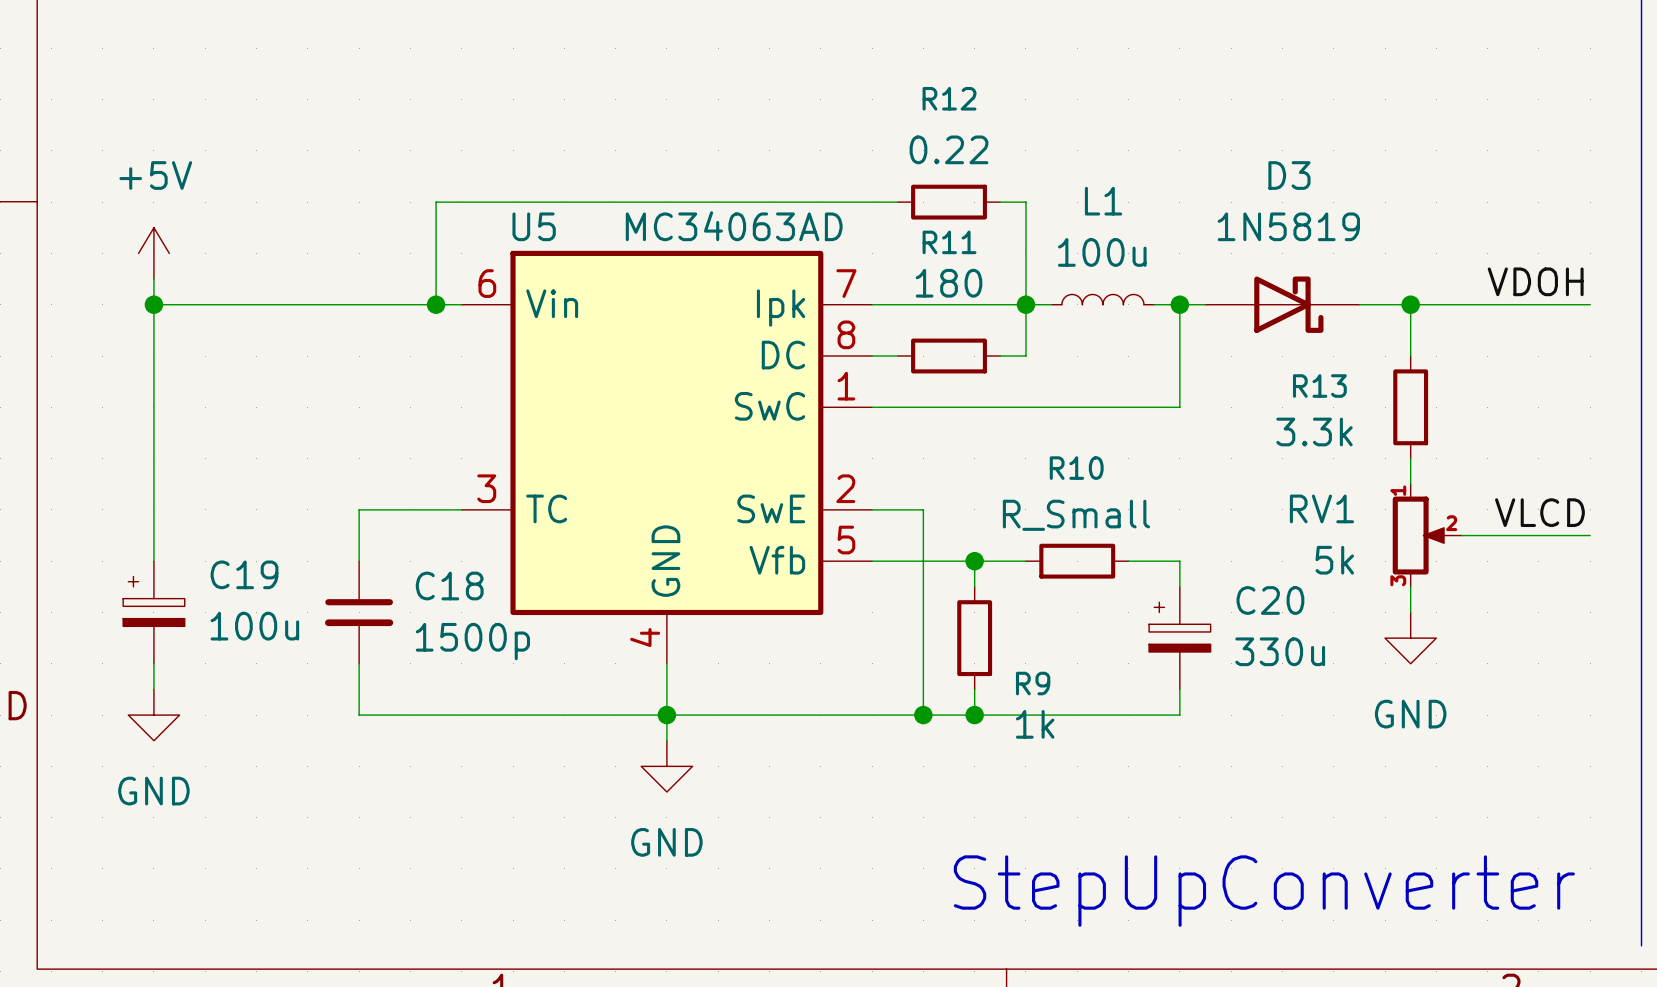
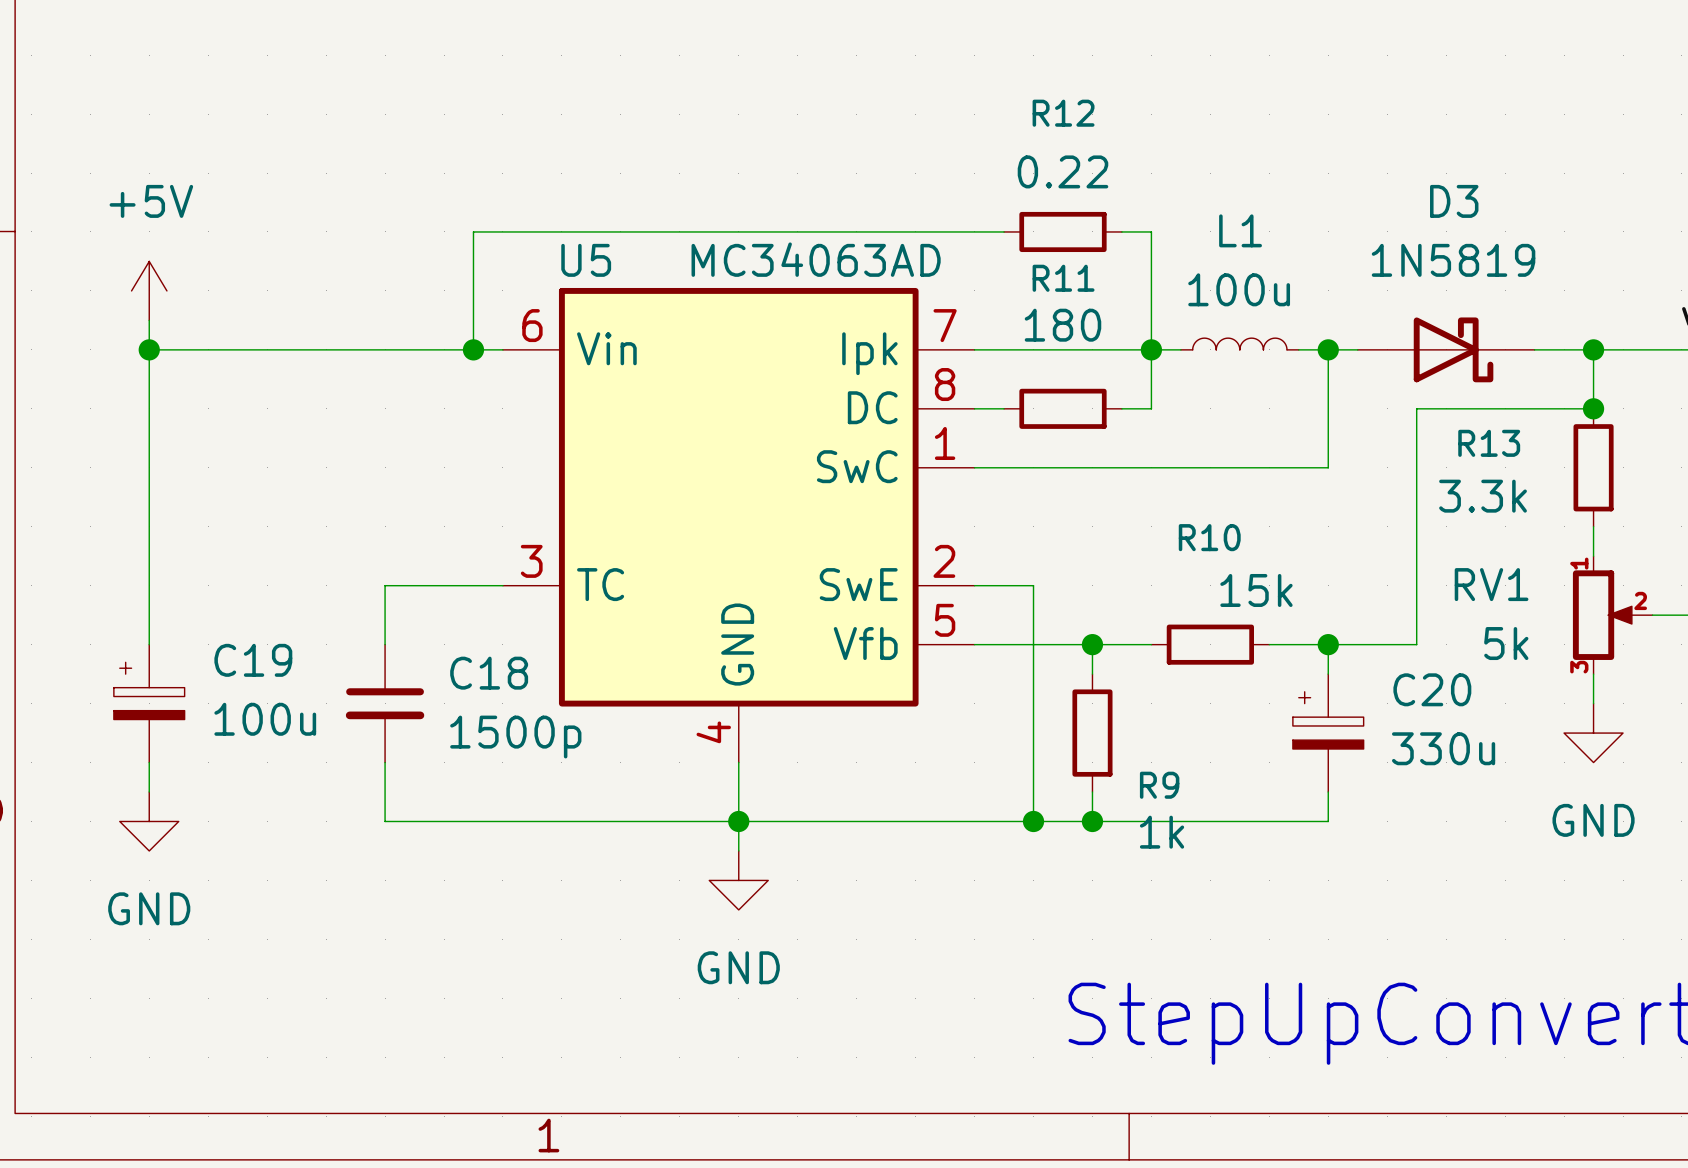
wire: none -> (1593, 408) (1416, 408) (1416, 644) (1328, 644)
junction: none -> (1593, 408)
R10 value: R_Small (1076, 515) -> 15k (1256, 590)
junction: none -> (1328, 644)

